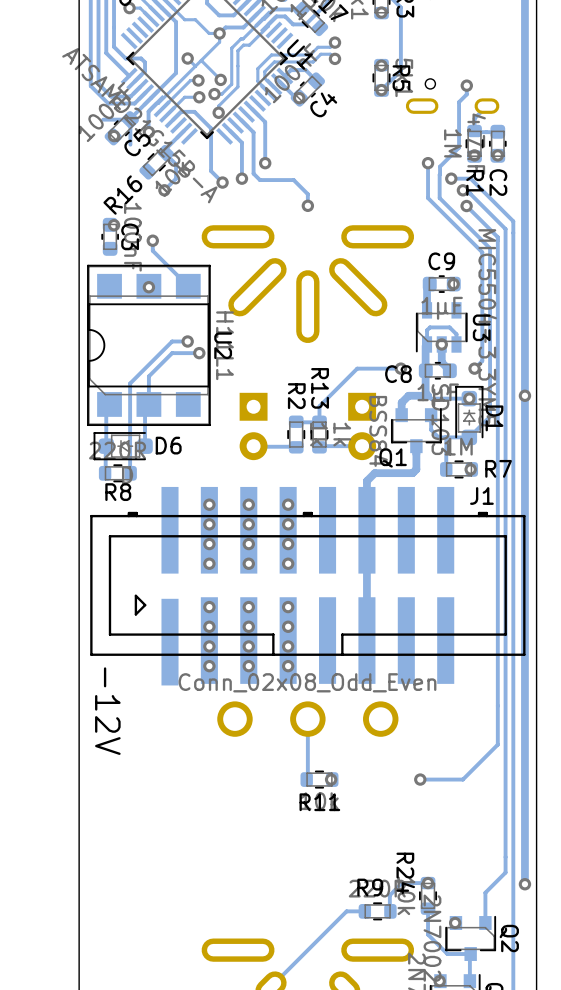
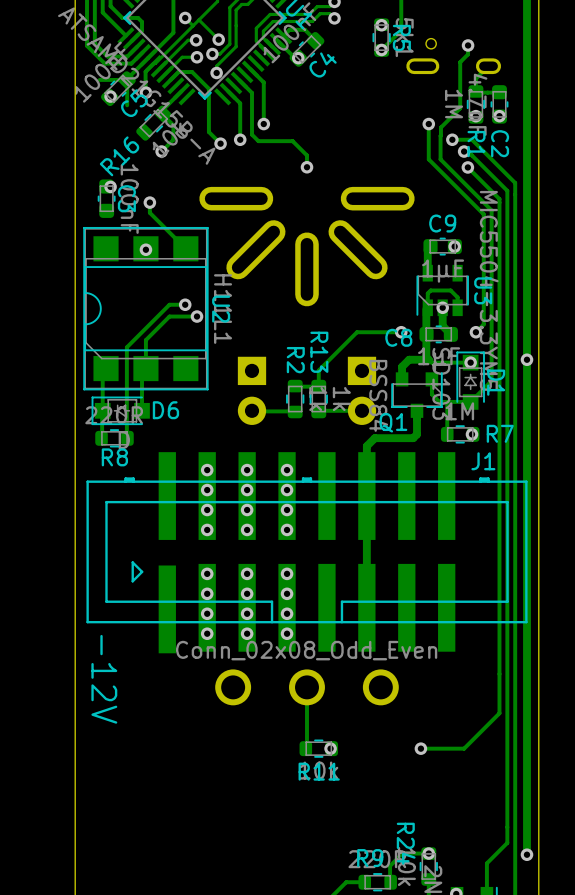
D1 footprint: [455, 385, 484, 446] -> [456, 351, 485, 410]
D6 footprint: [93, 432, 153, 461] -> [91, 396, 150, 426]

